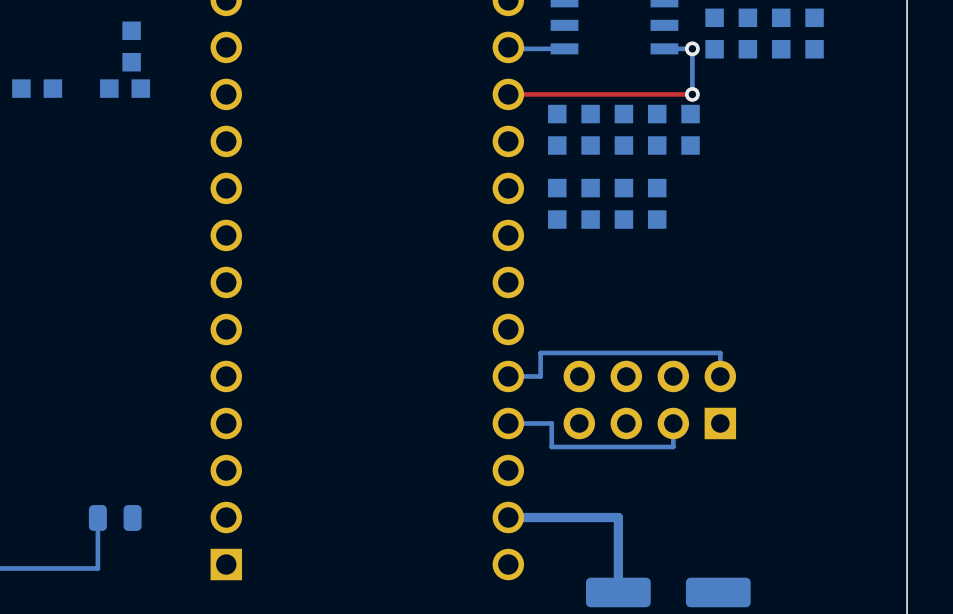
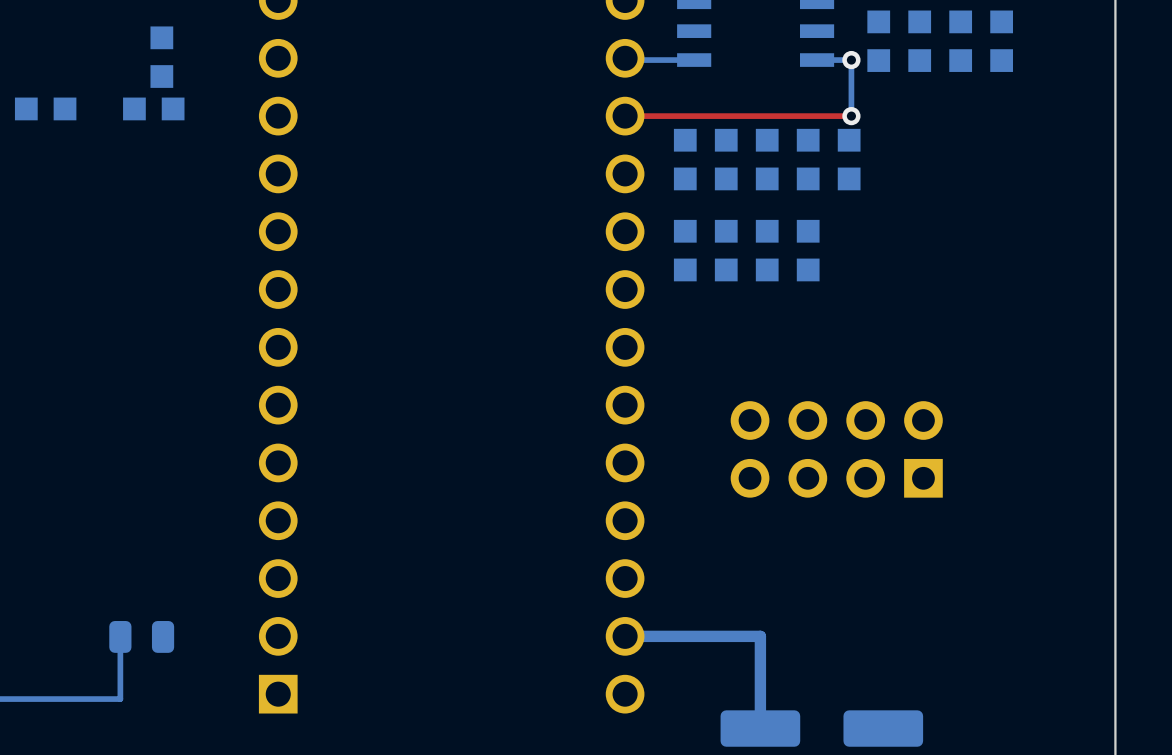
bottom track: (508, 376) (540, 376) (540, 352) (720, 352) (720, 376) -> none
part position: (649, 399) -> (836, 449)
bottom track: (508, 423) (551, 423) (551, 446) (673, 446) (673, 423) -> none

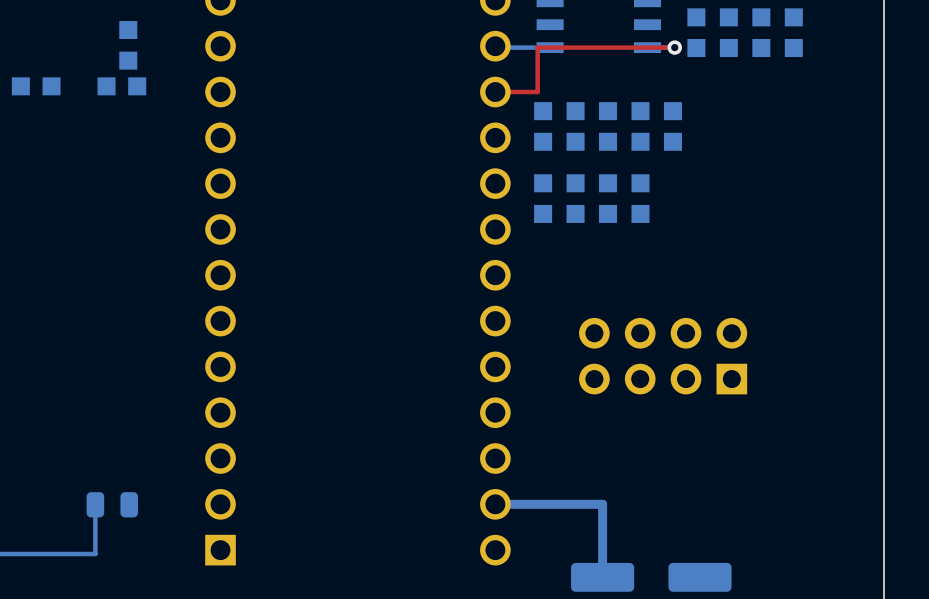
bottom track: (851, 60) (851, 116) -> none
top track: (678, 116) (851, 116) -> (537, 92) (537, 47) (674, 47)
via: (851, 116) -> none

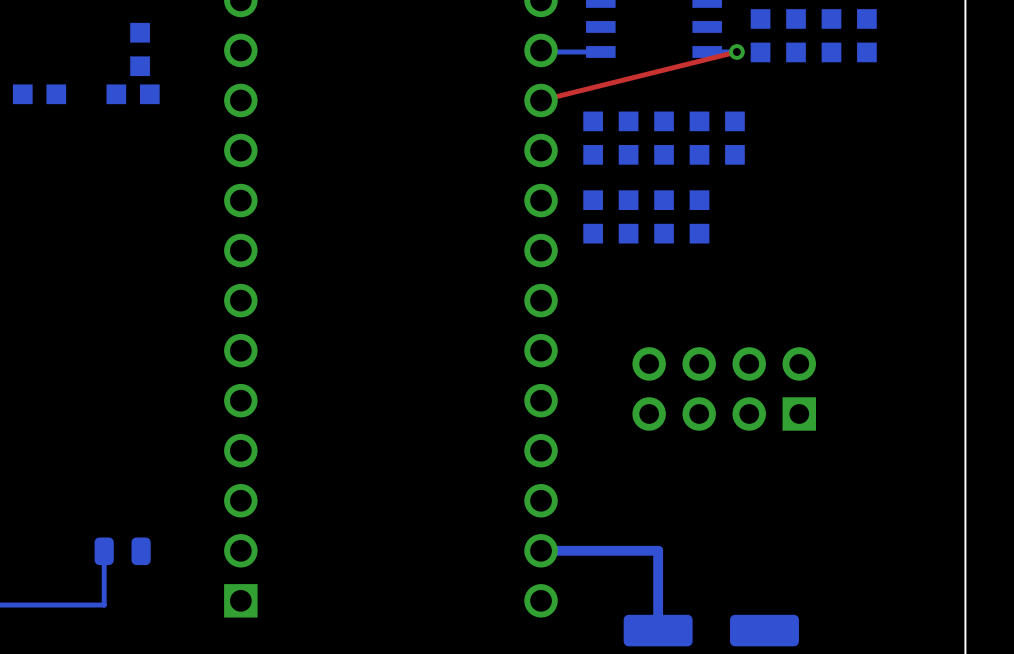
top track: (674, 47) (537, 47) (537, 92) (495, 92) -> (736, 51) (541, 100)

